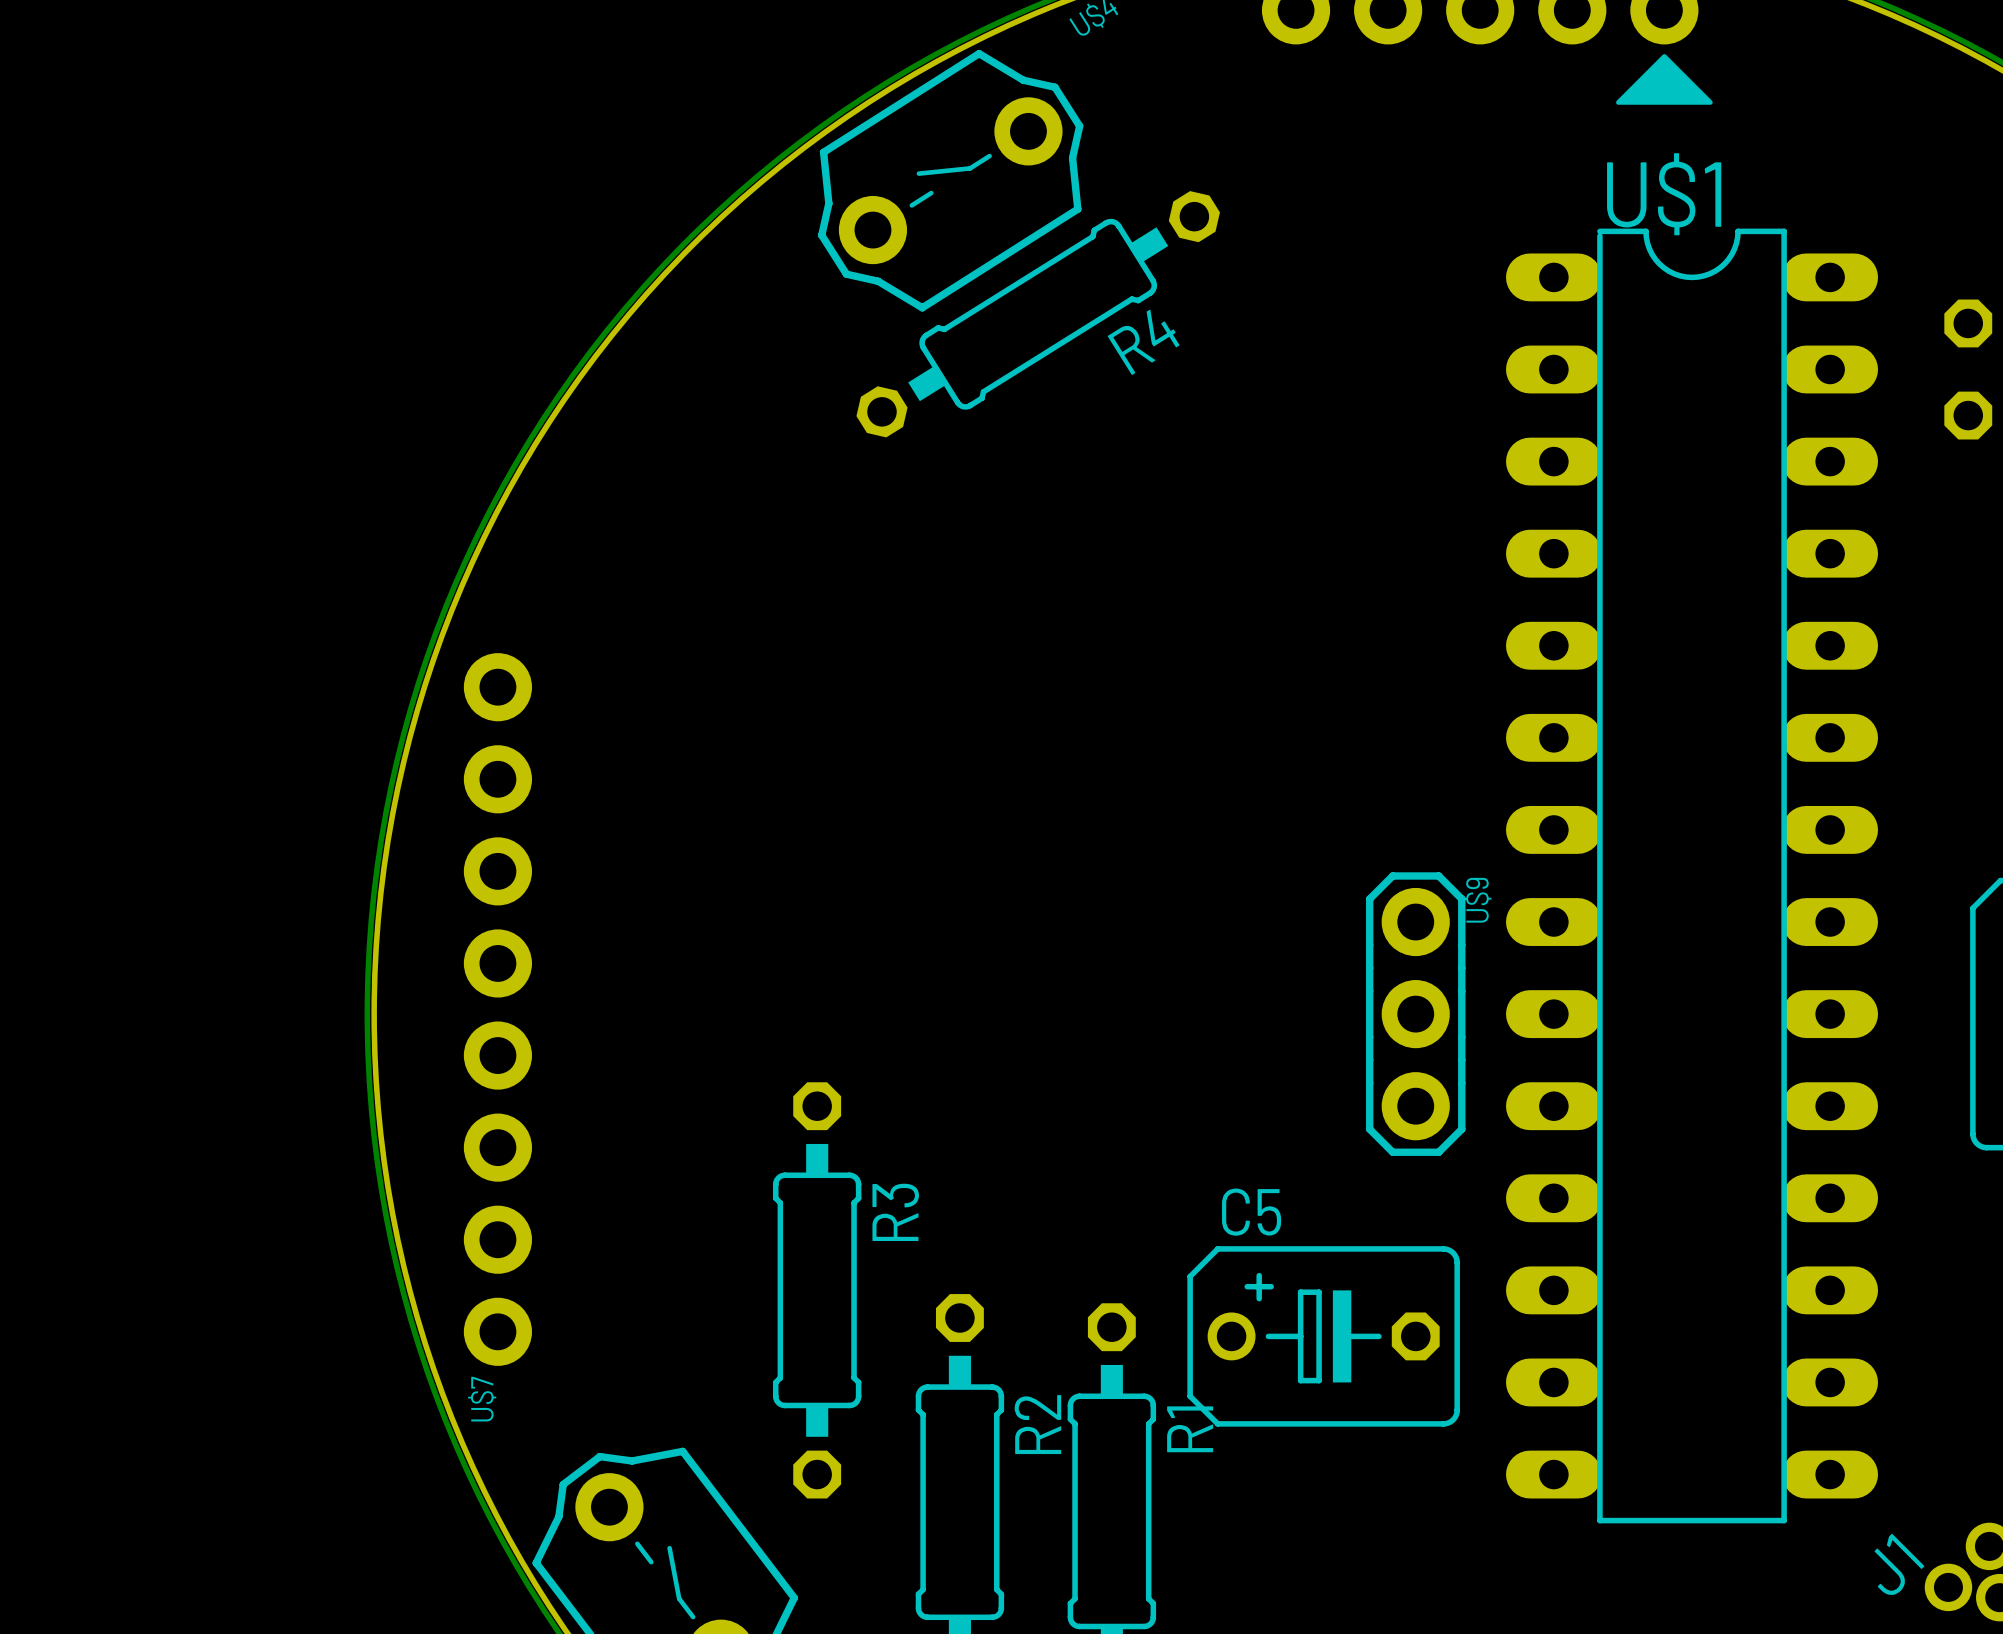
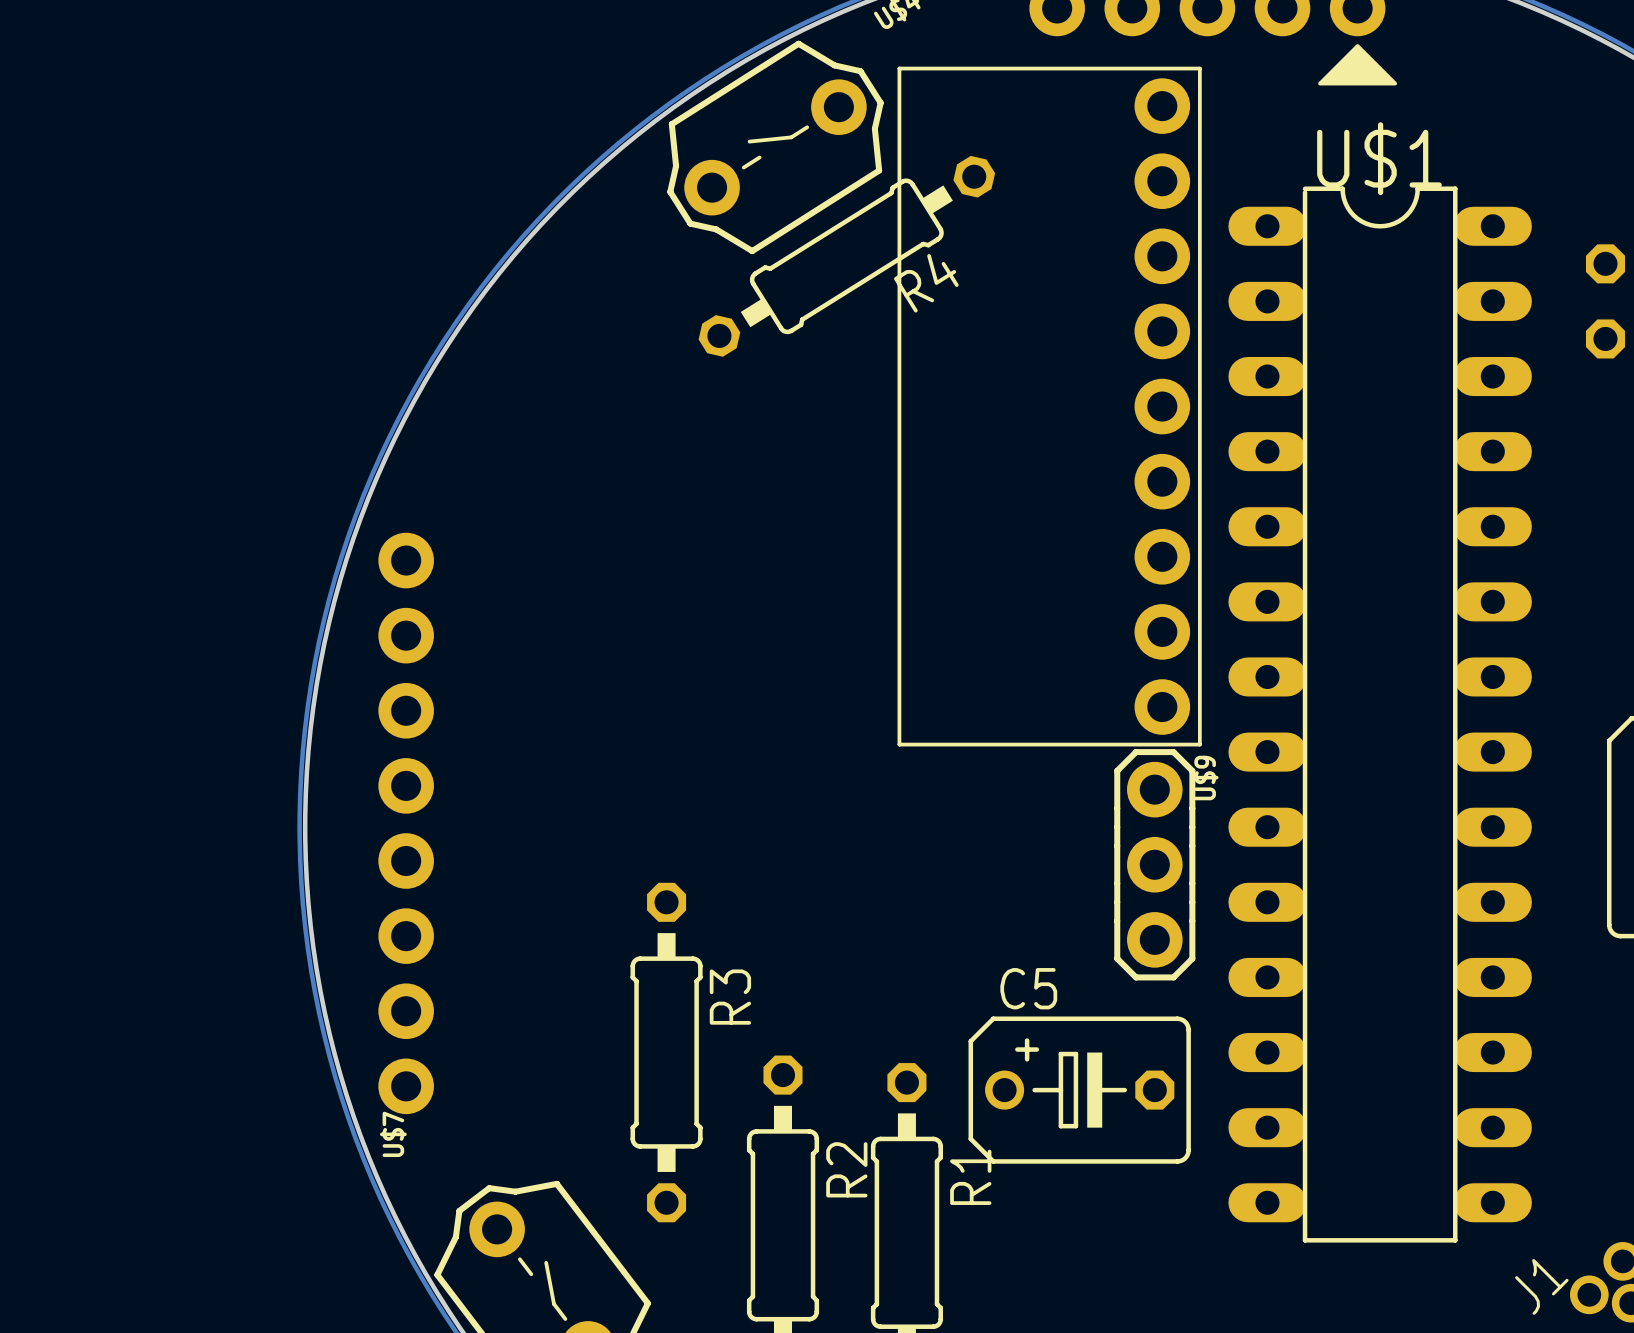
part: none -> (1049, 406)
U$9 position: (1415, 1014) -> (1154, 864)

